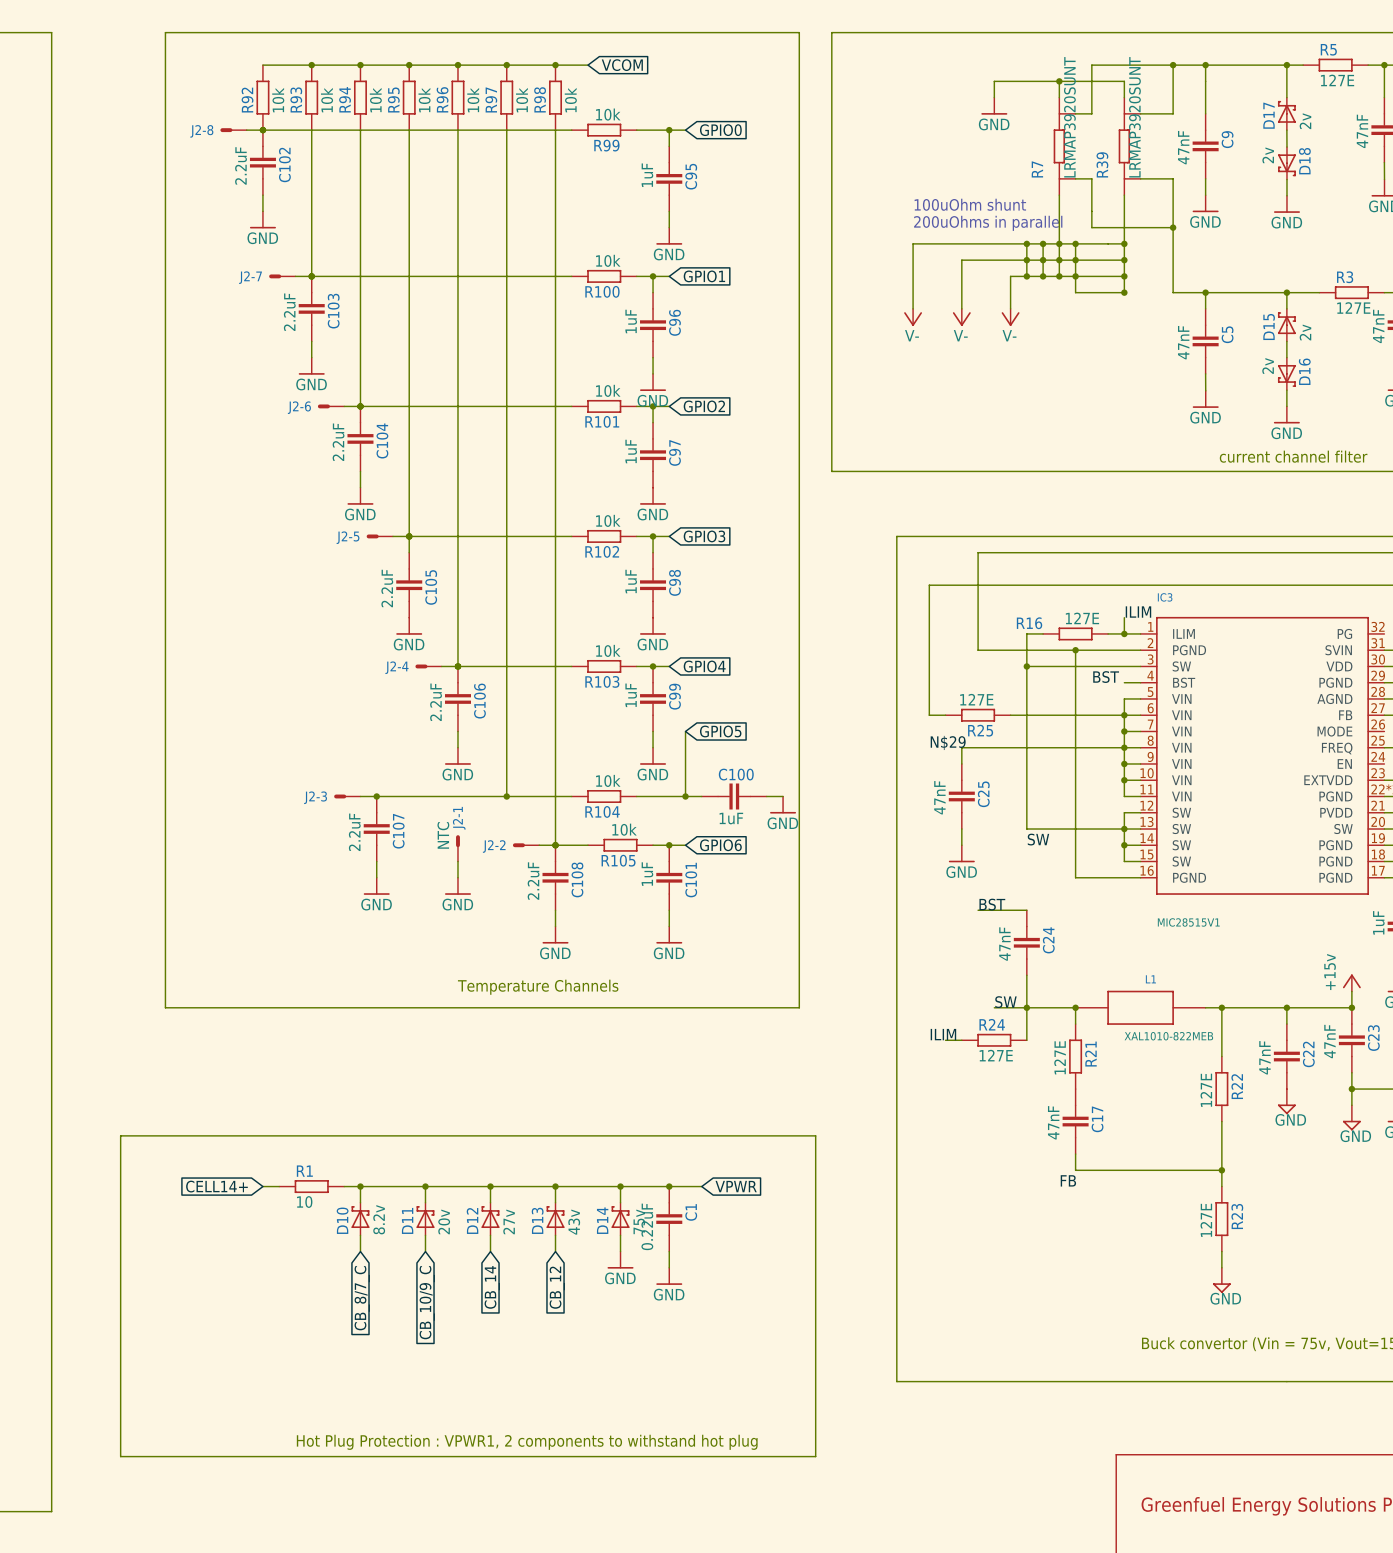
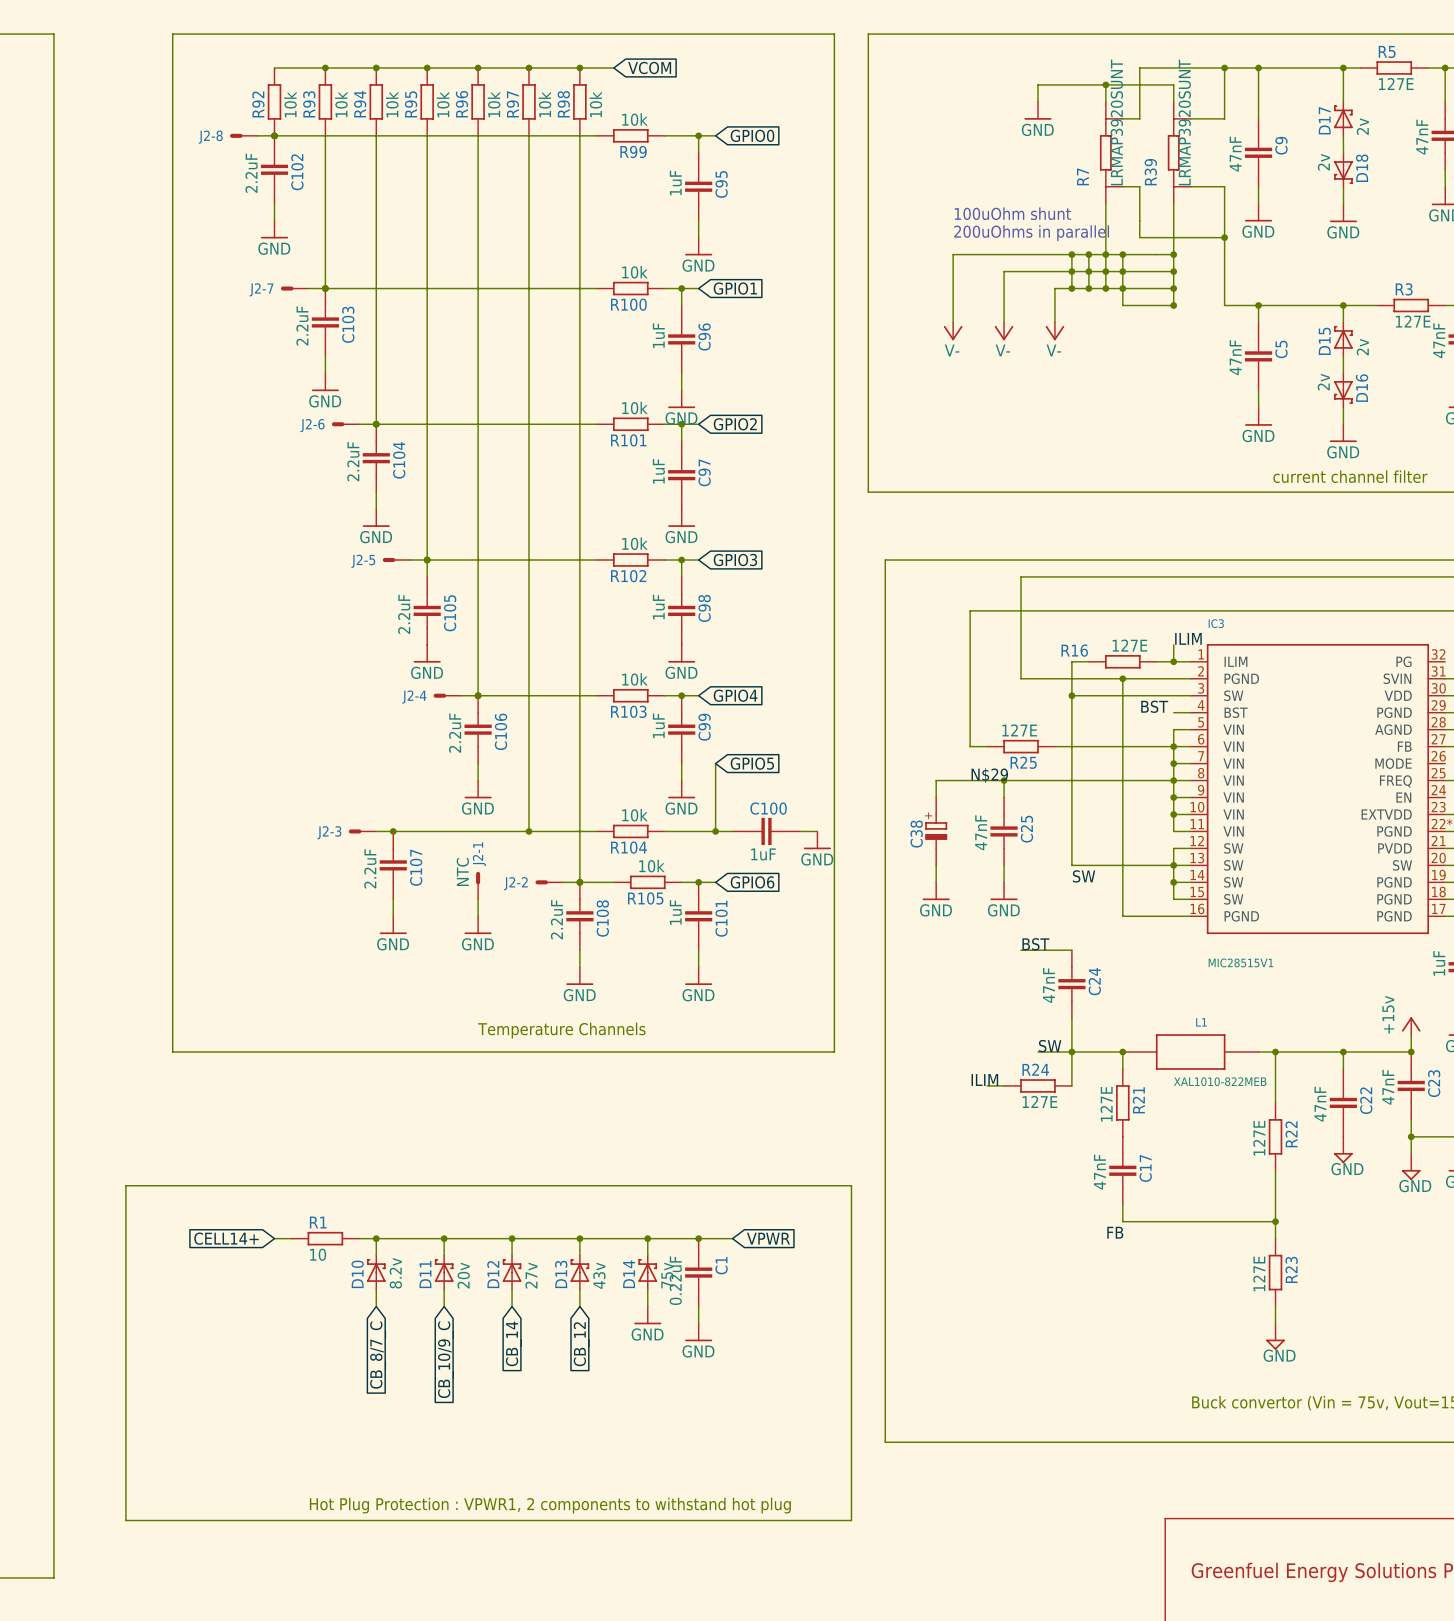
wire: (896, 536) (896, 747) -> (1004, 780) (936, 780)
junction: none -> (1004, 780)
C38: none -> (936, 831)
wire: (896, 845) (896, 1381) -> (936, 560) (885, 560) (885, 1442) (936, 1442)
power symbol: none -> GND (936, 891)

